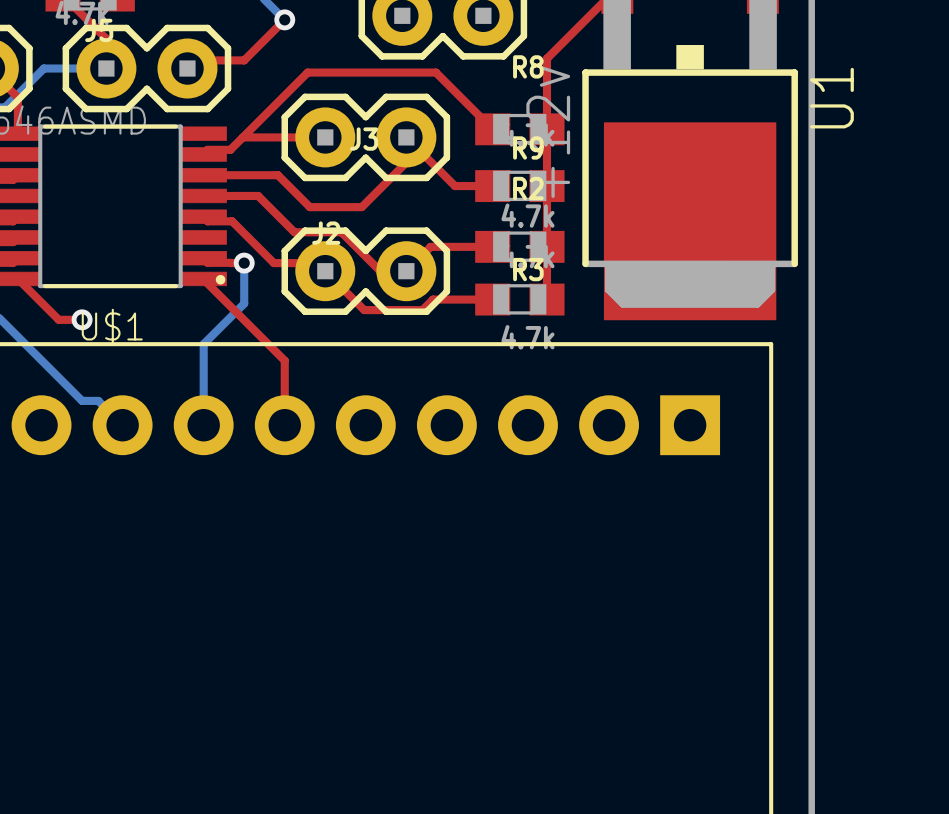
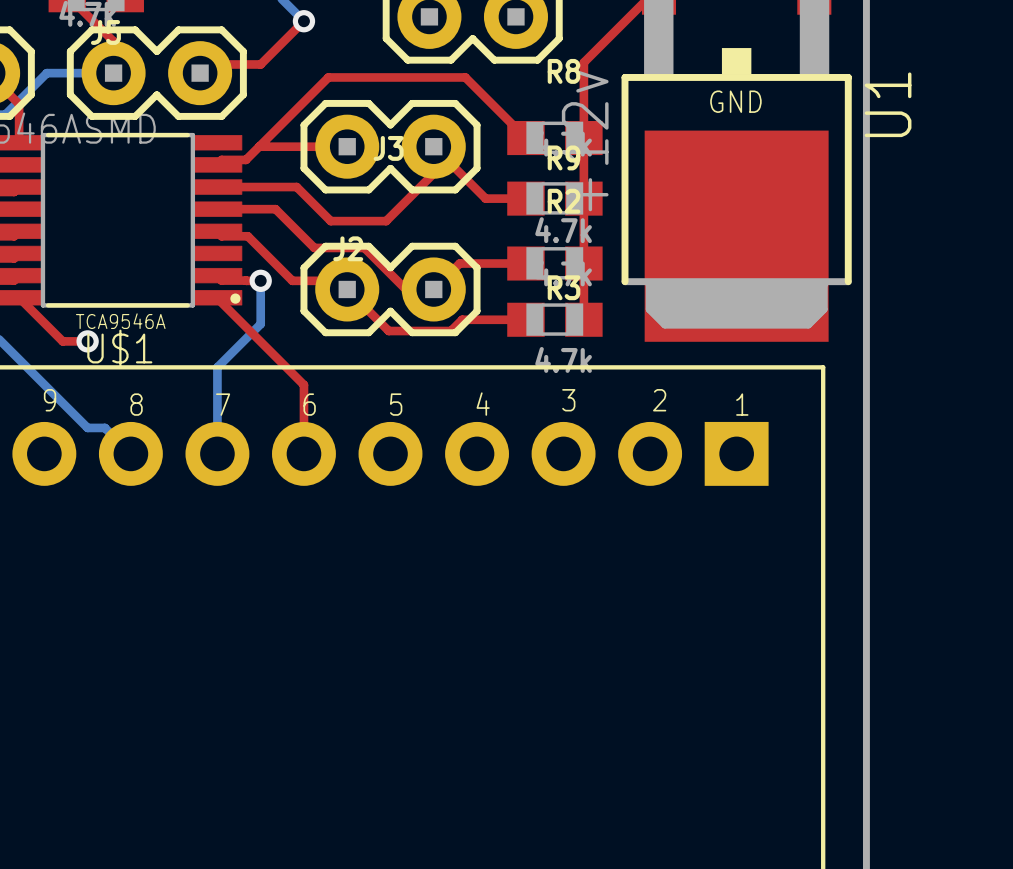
text: none -> GND (735, 101)
text: none -> TCA9546A (120, 321)
text: none -> 9 (50, 400)
text: none -> 3 (568, 400)
text: none -> 2 (659, 400)
text: none -> 4 (483, 404)
text: none -> 8 (136, 404)
text: none -> 7 (223, 404)
text: none -> 6 (309, 404)
text: none -> 5 (396, 404)
text: none -> 1 (742, 404)

